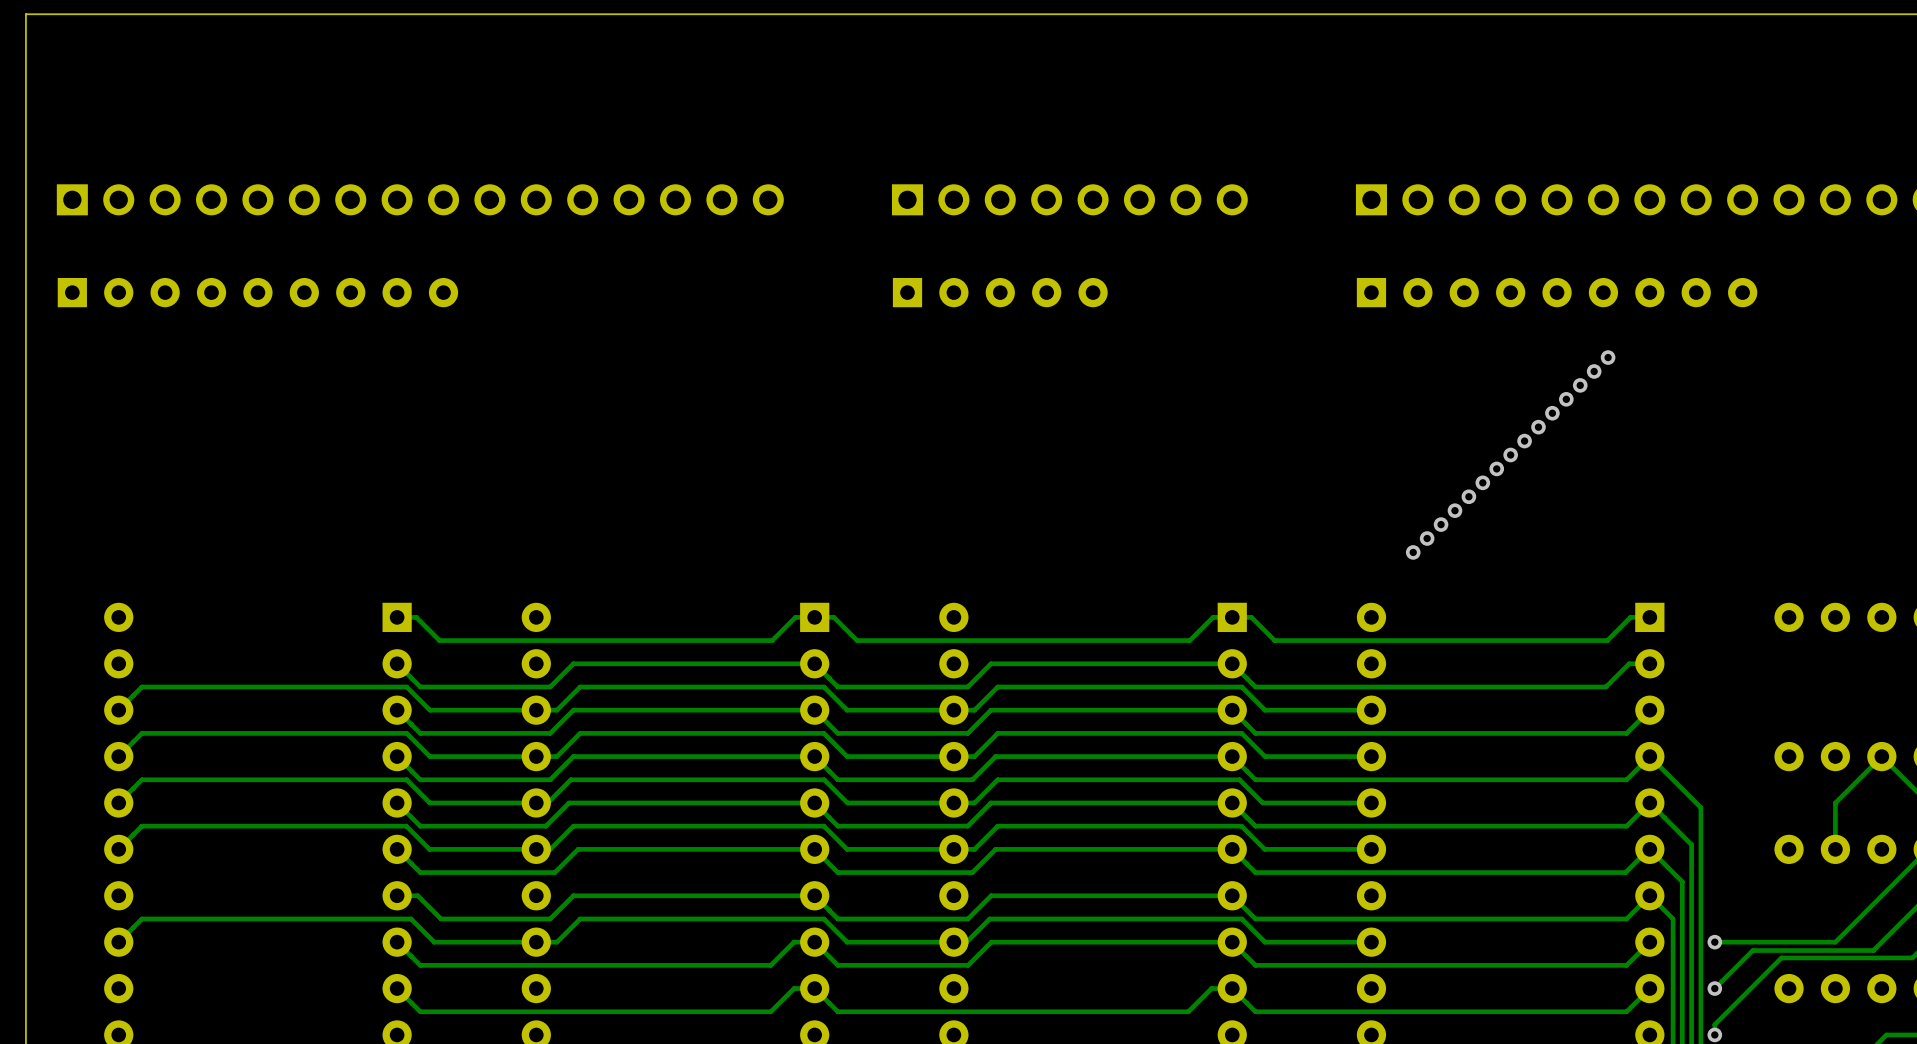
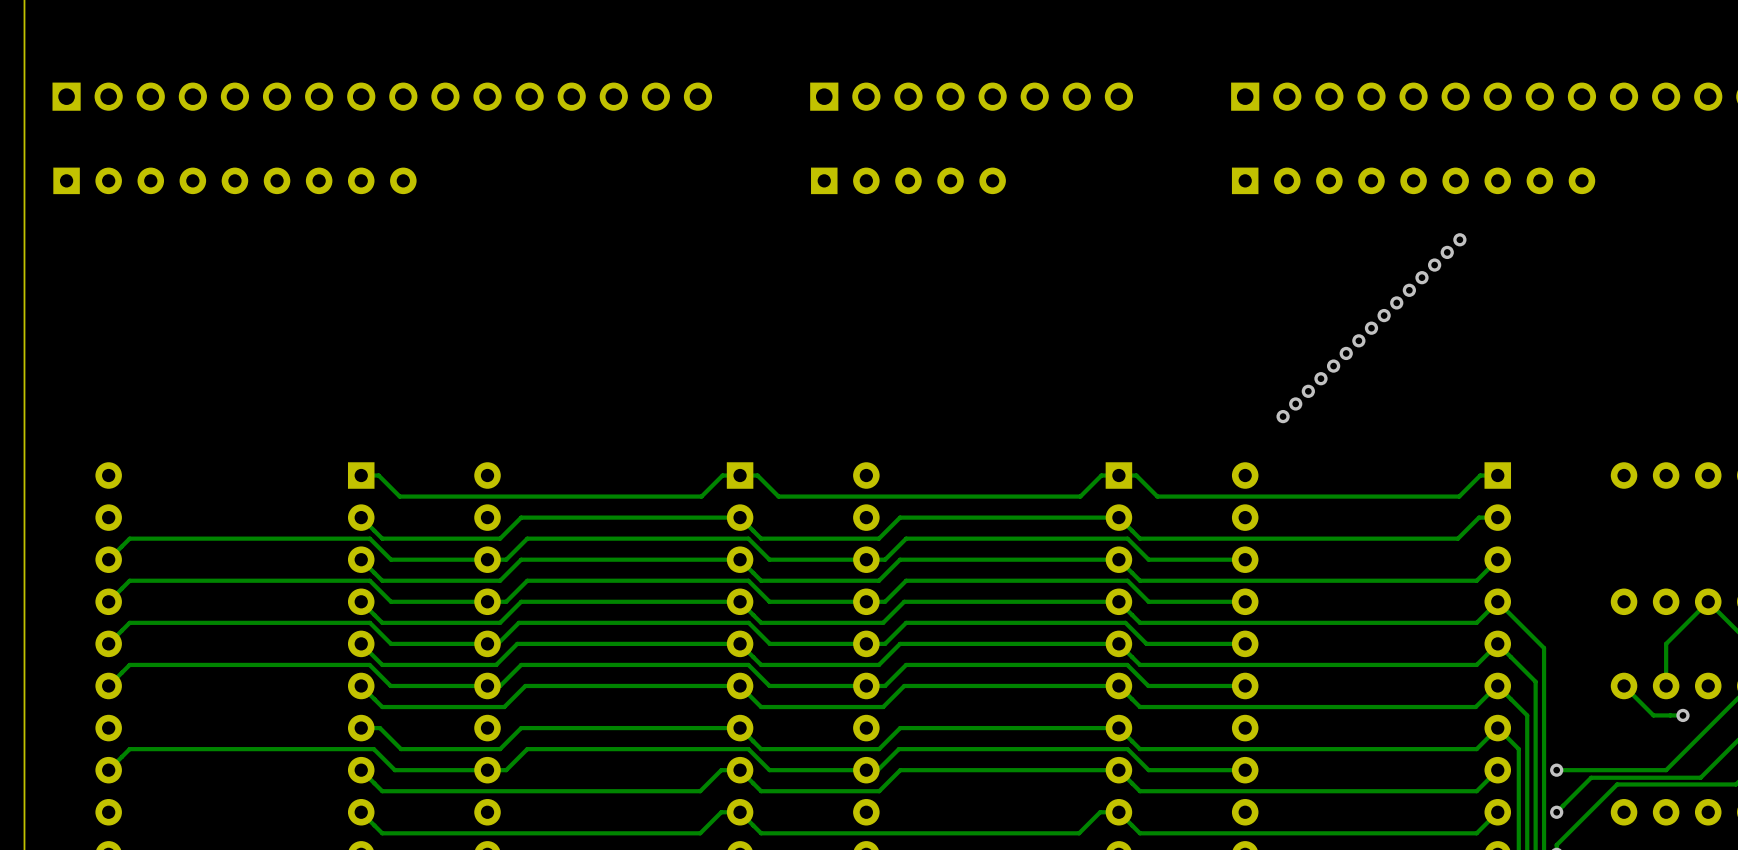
track: none -> (1624, 685) (1653, 715) (1682, 715)
via: none -> (1682, 715)

